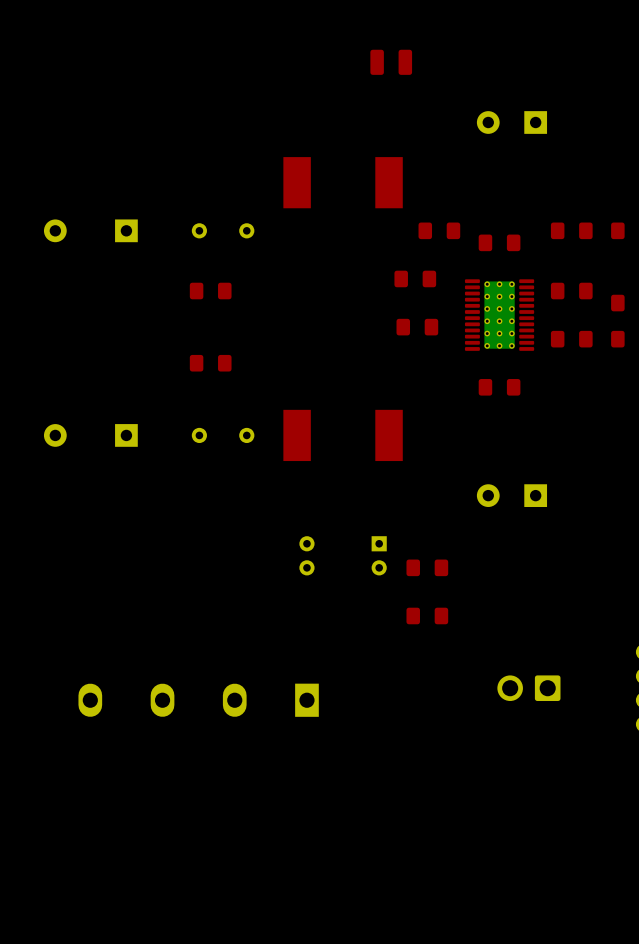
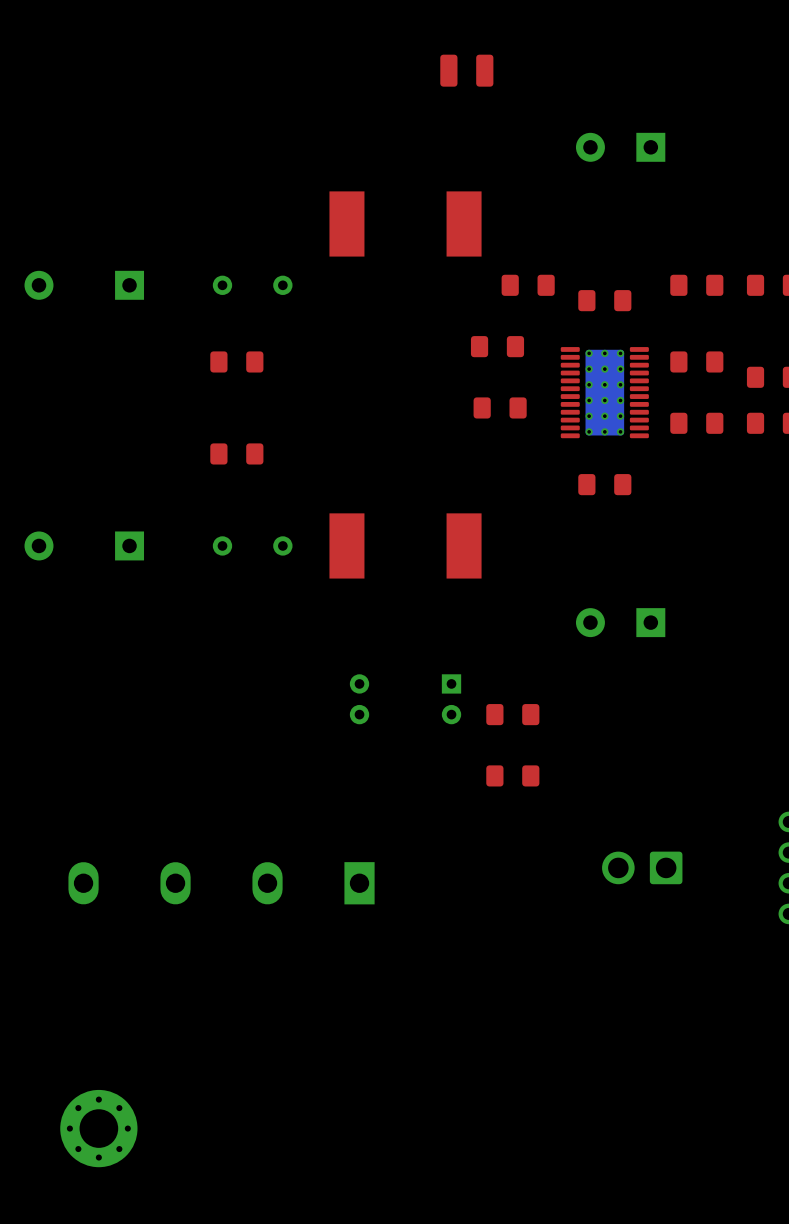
part: none -> (98, 1128)

